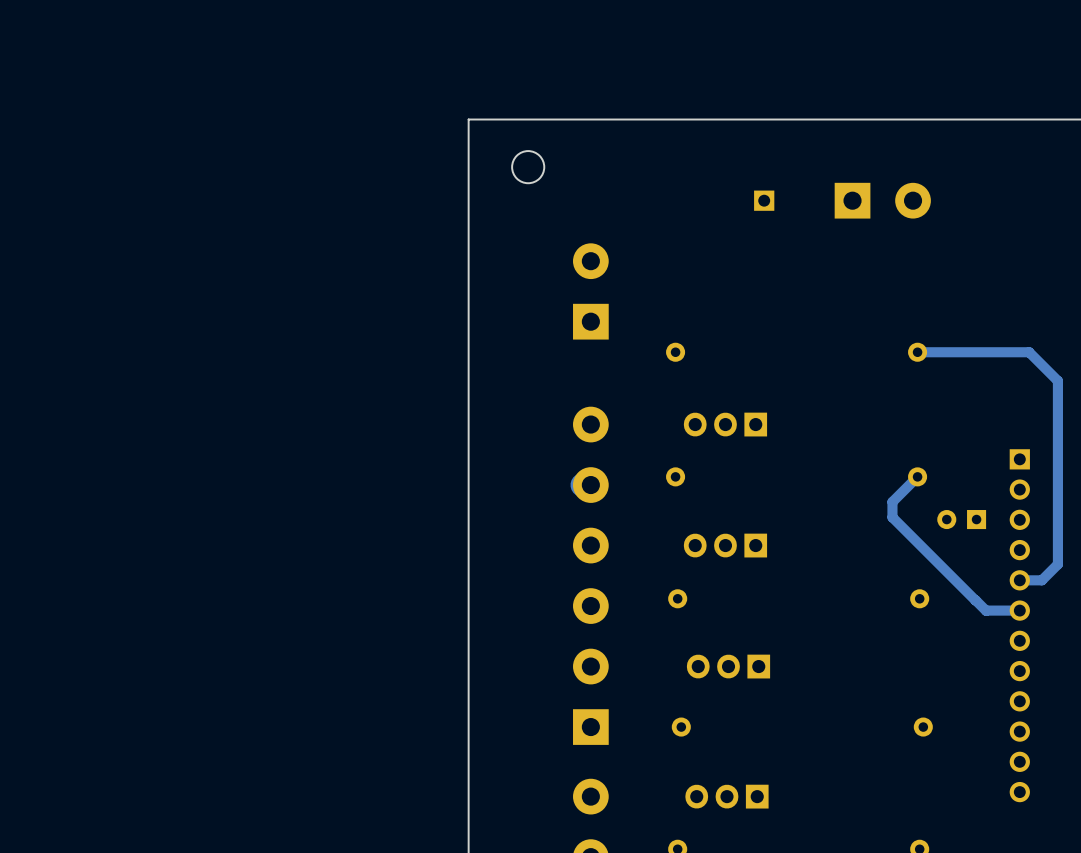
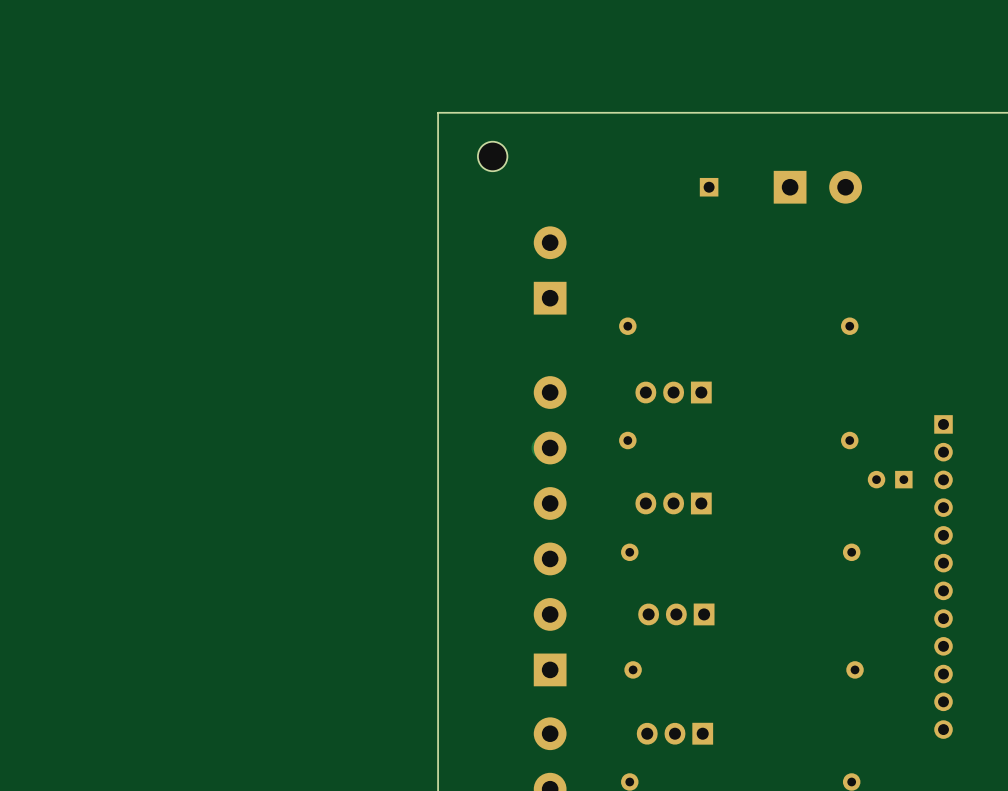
track: (917, 352) (1029, 352) (1057, 380) (1057, 564) (1041, 580) (1019, 580) -> none
track: (917, 476) (892, 501) (892, 517) (986, 610) (1019, 610) -> none

